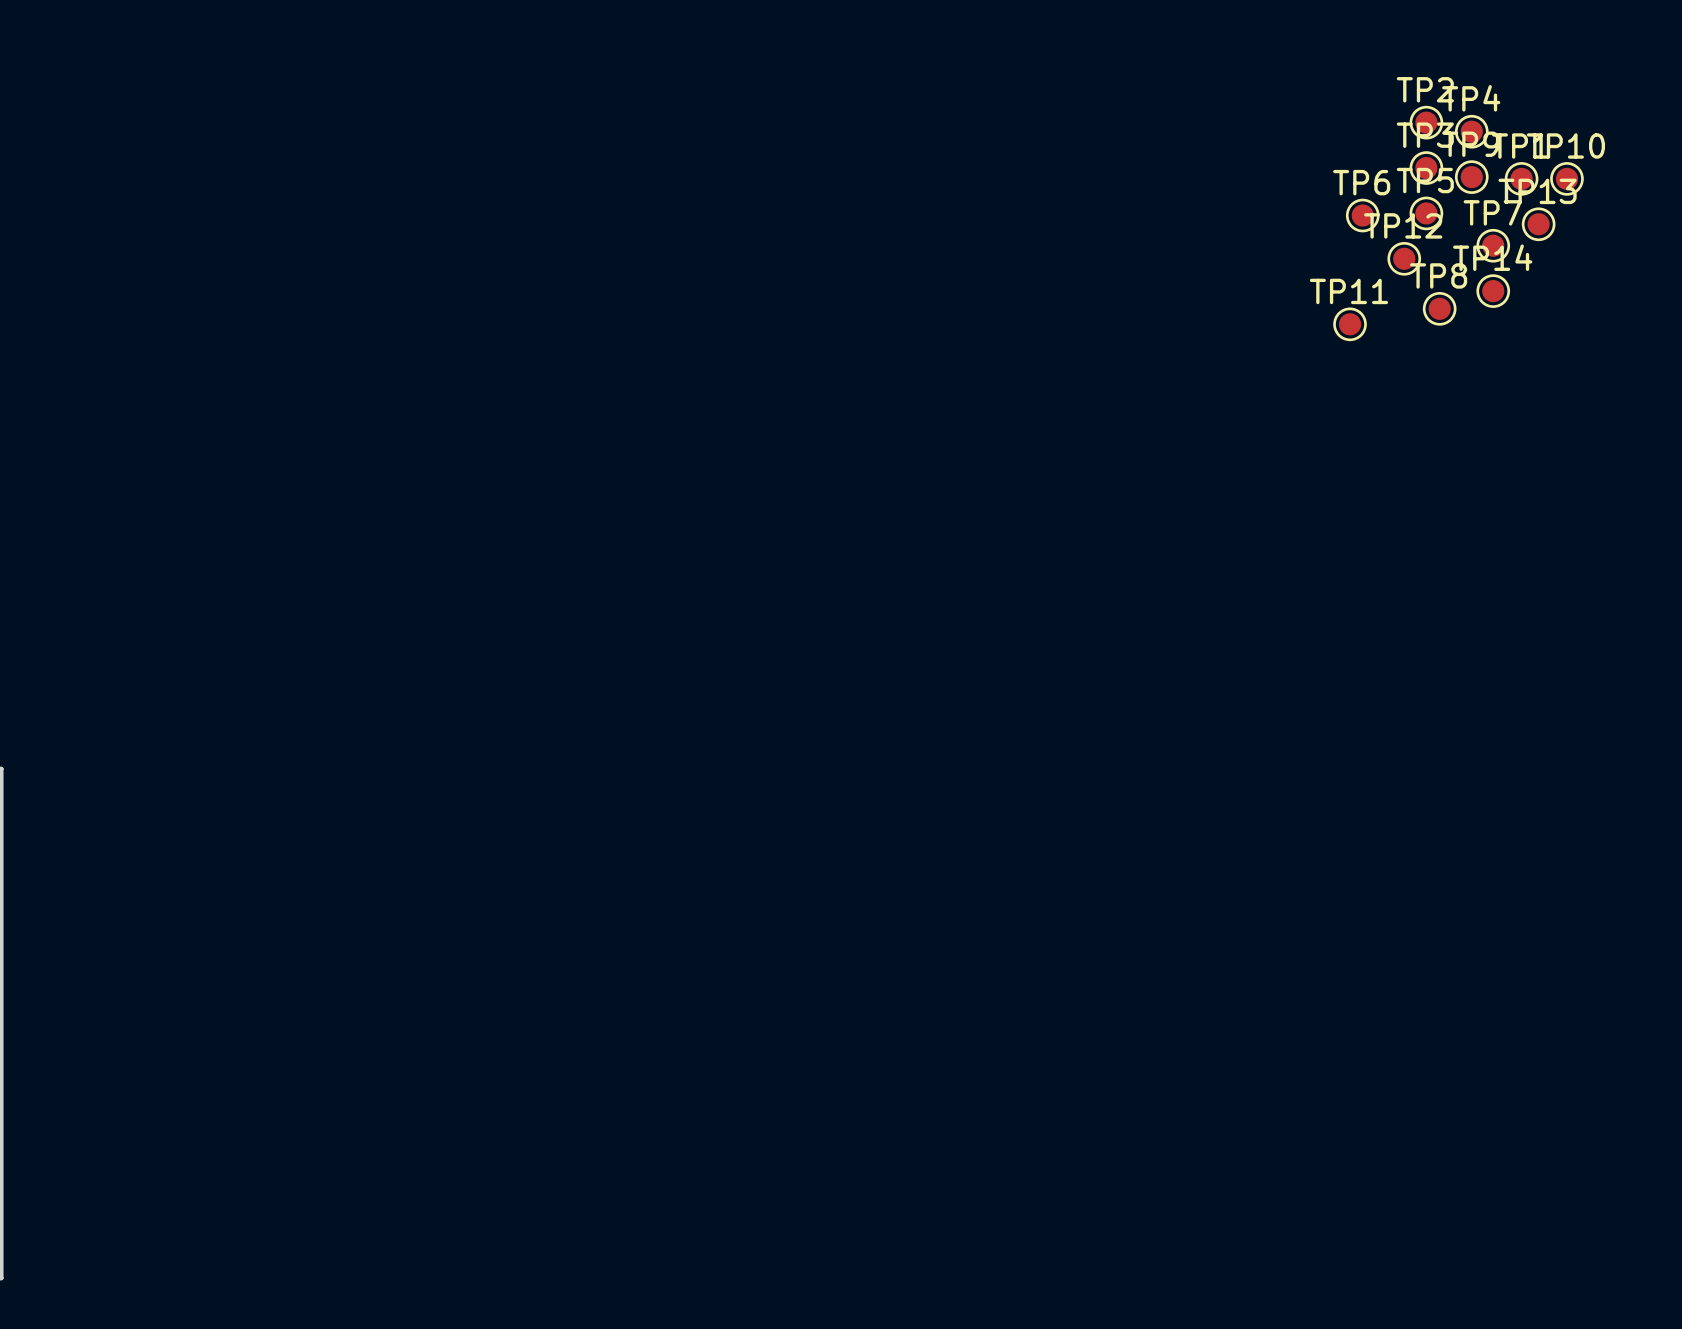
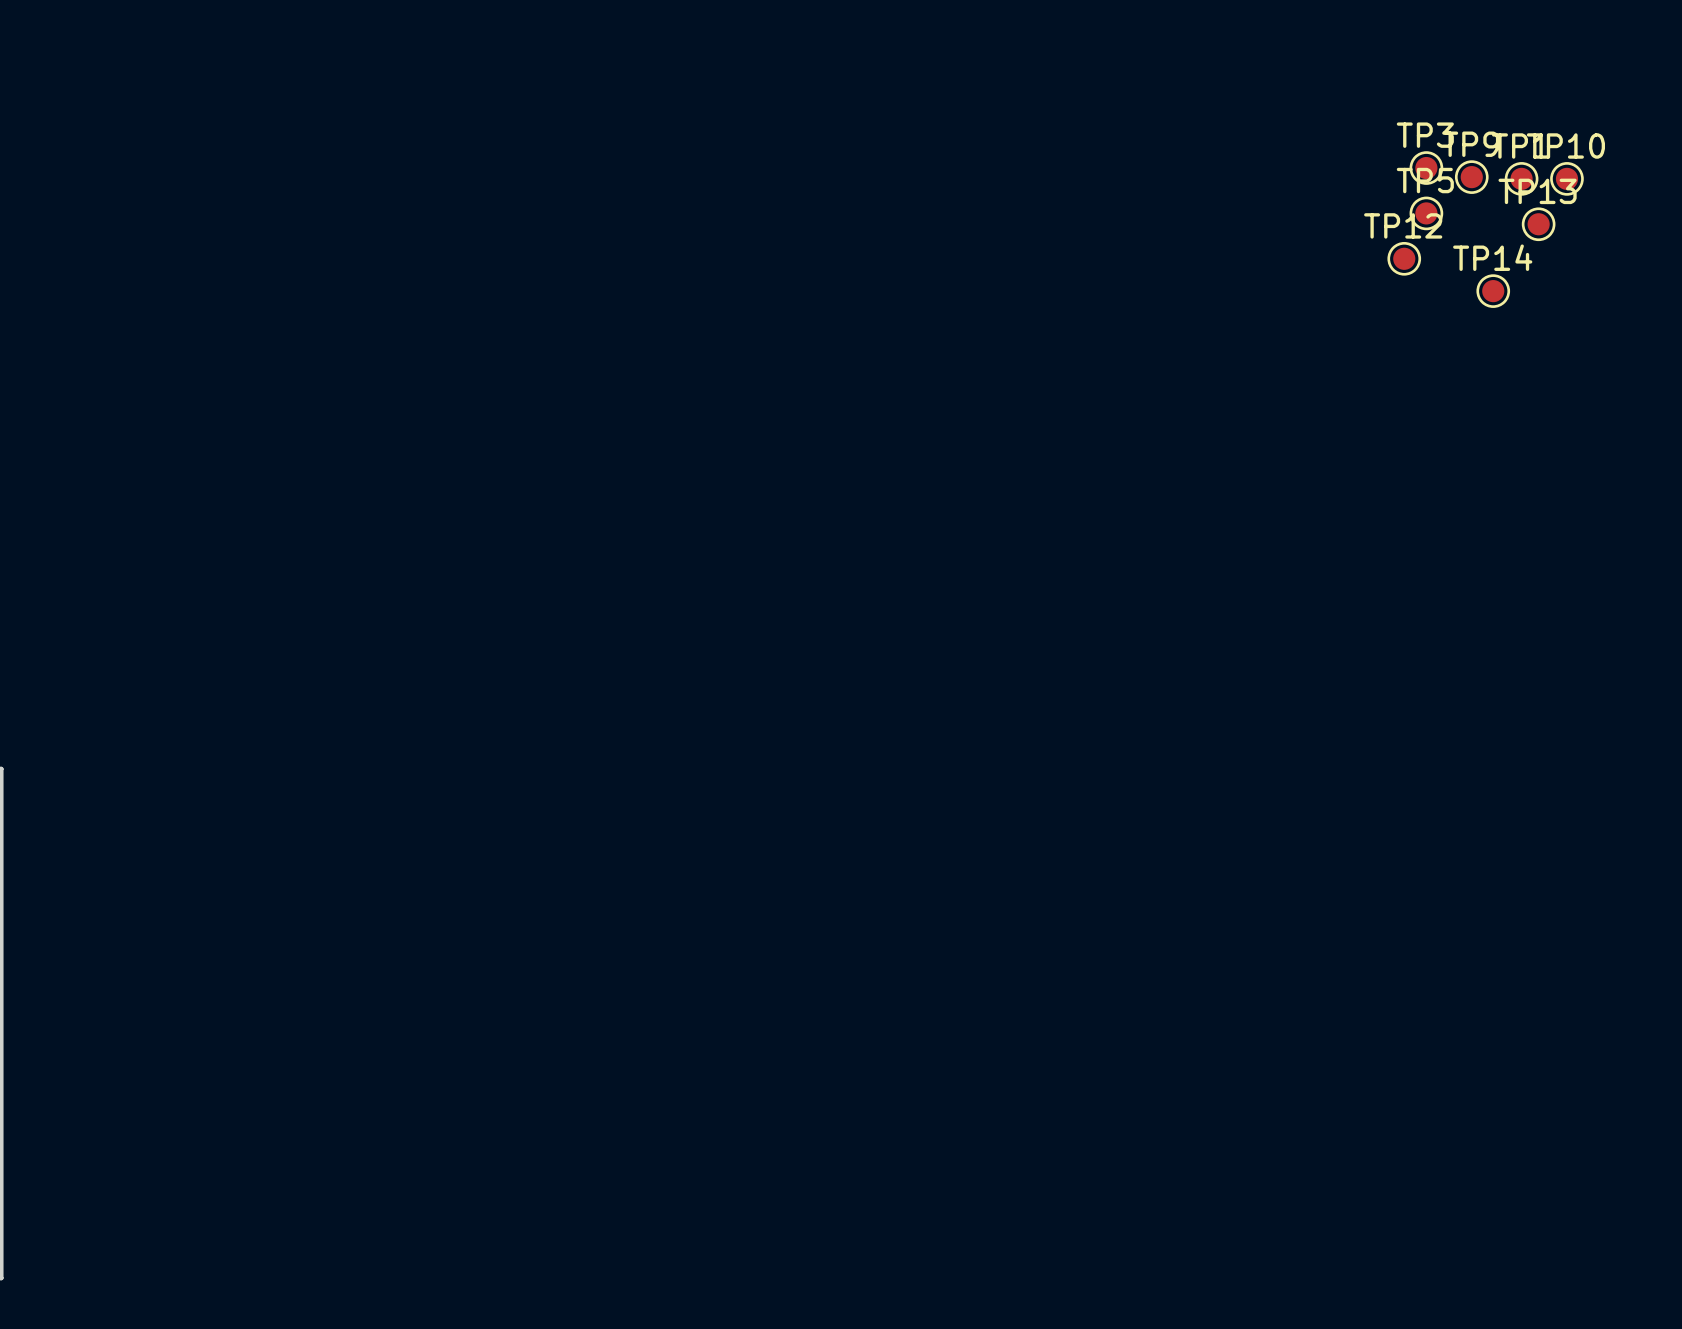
TP2: (1426, 122) -> none
TP4: (1471, 131) -> none
TP6: (1362, 215) -> none
TP7: (1493, 245) -> none
TP8: (1439, 308) -> none
TP11: (1350, 324) -> none

